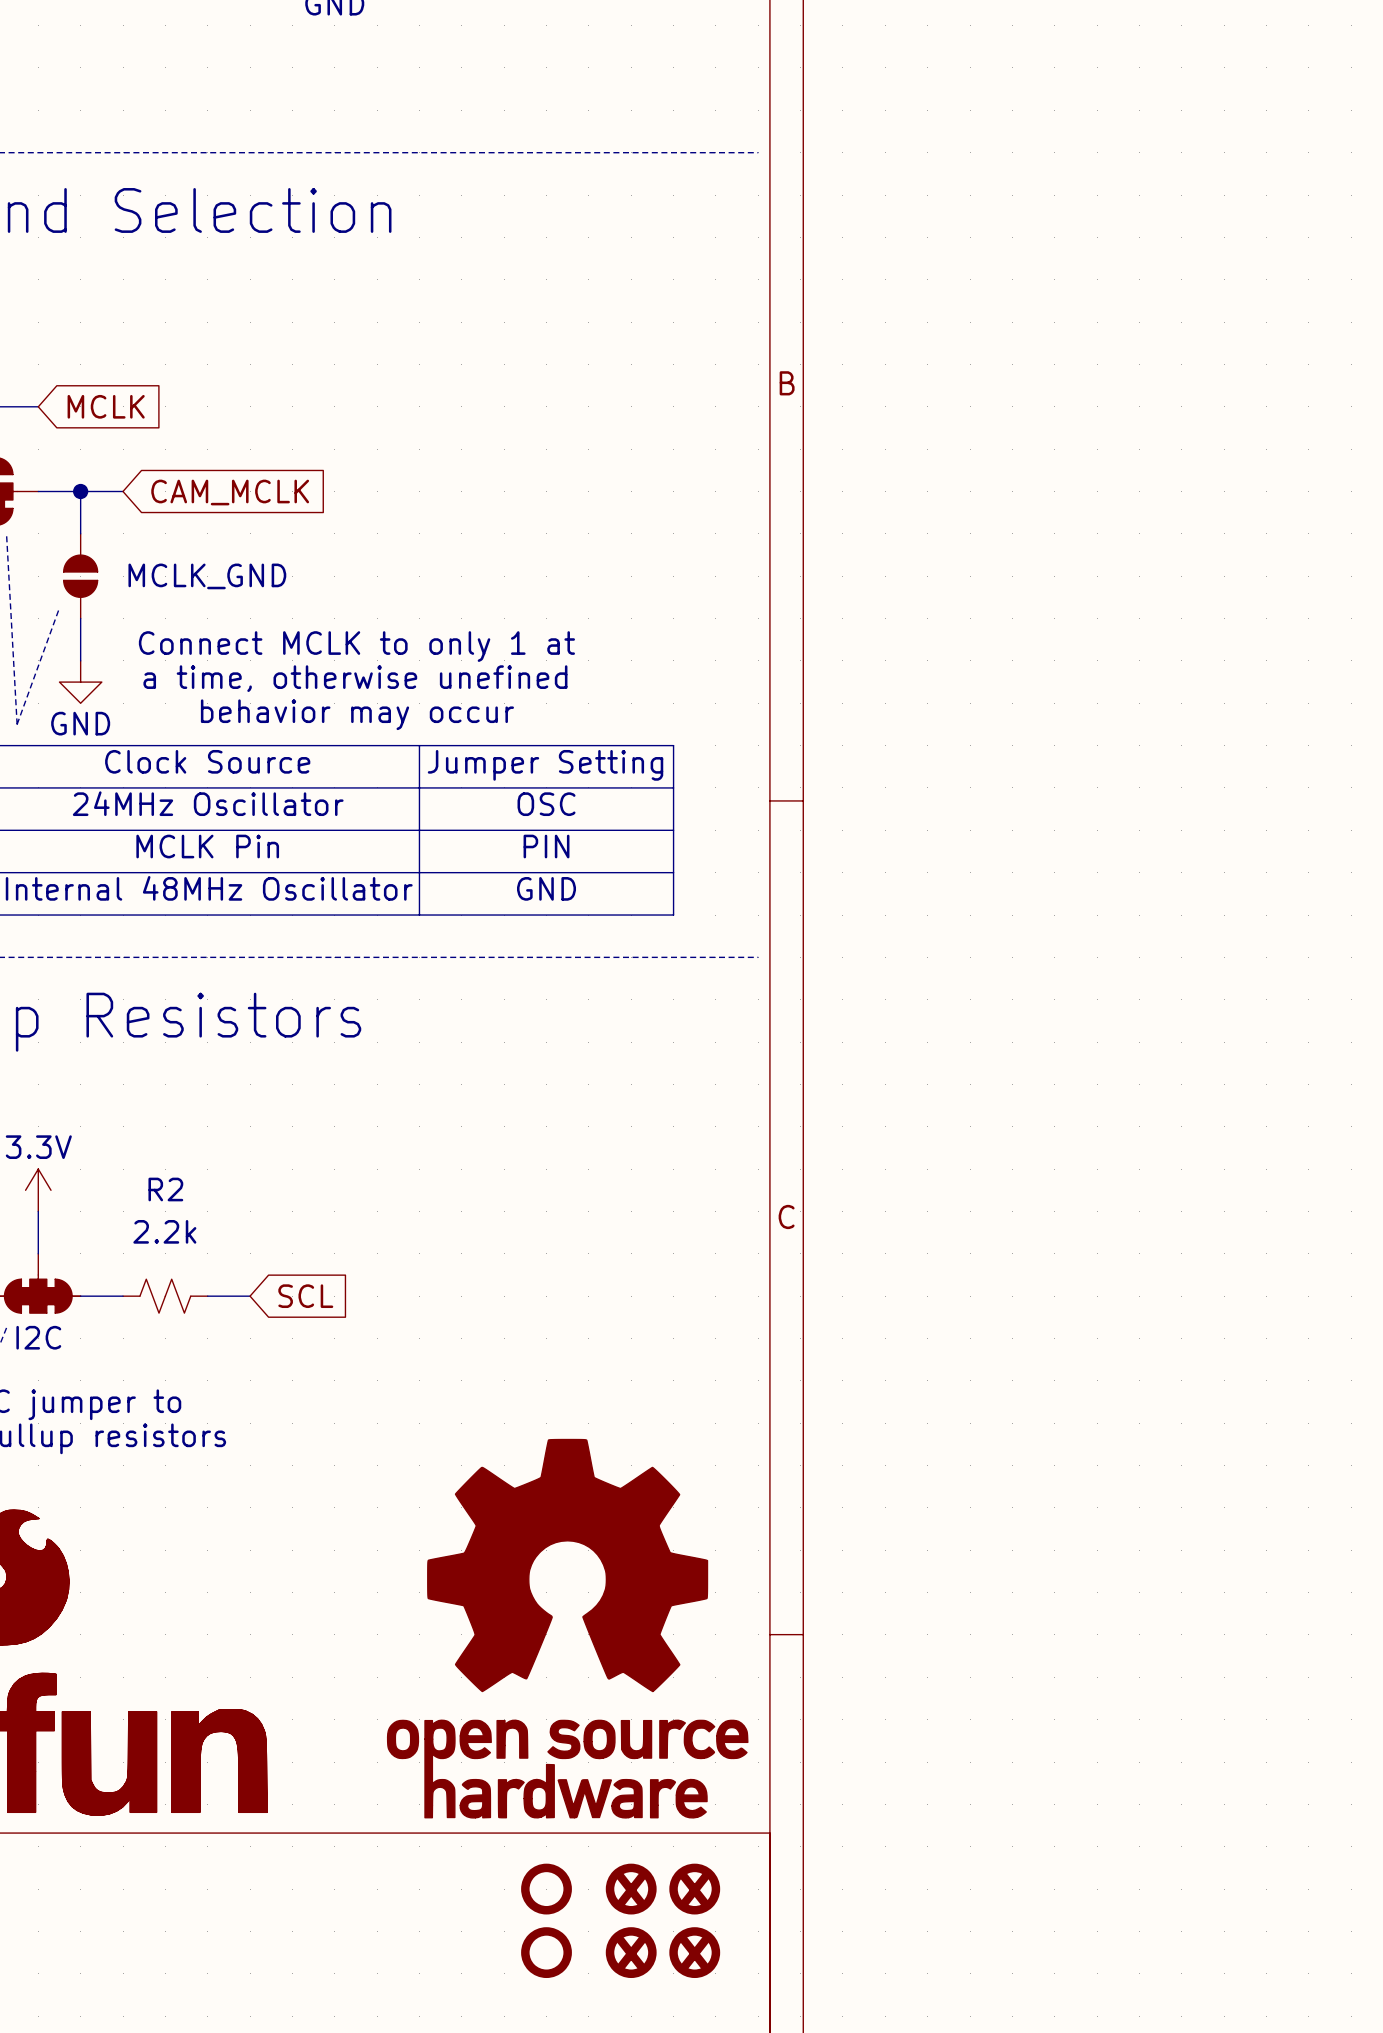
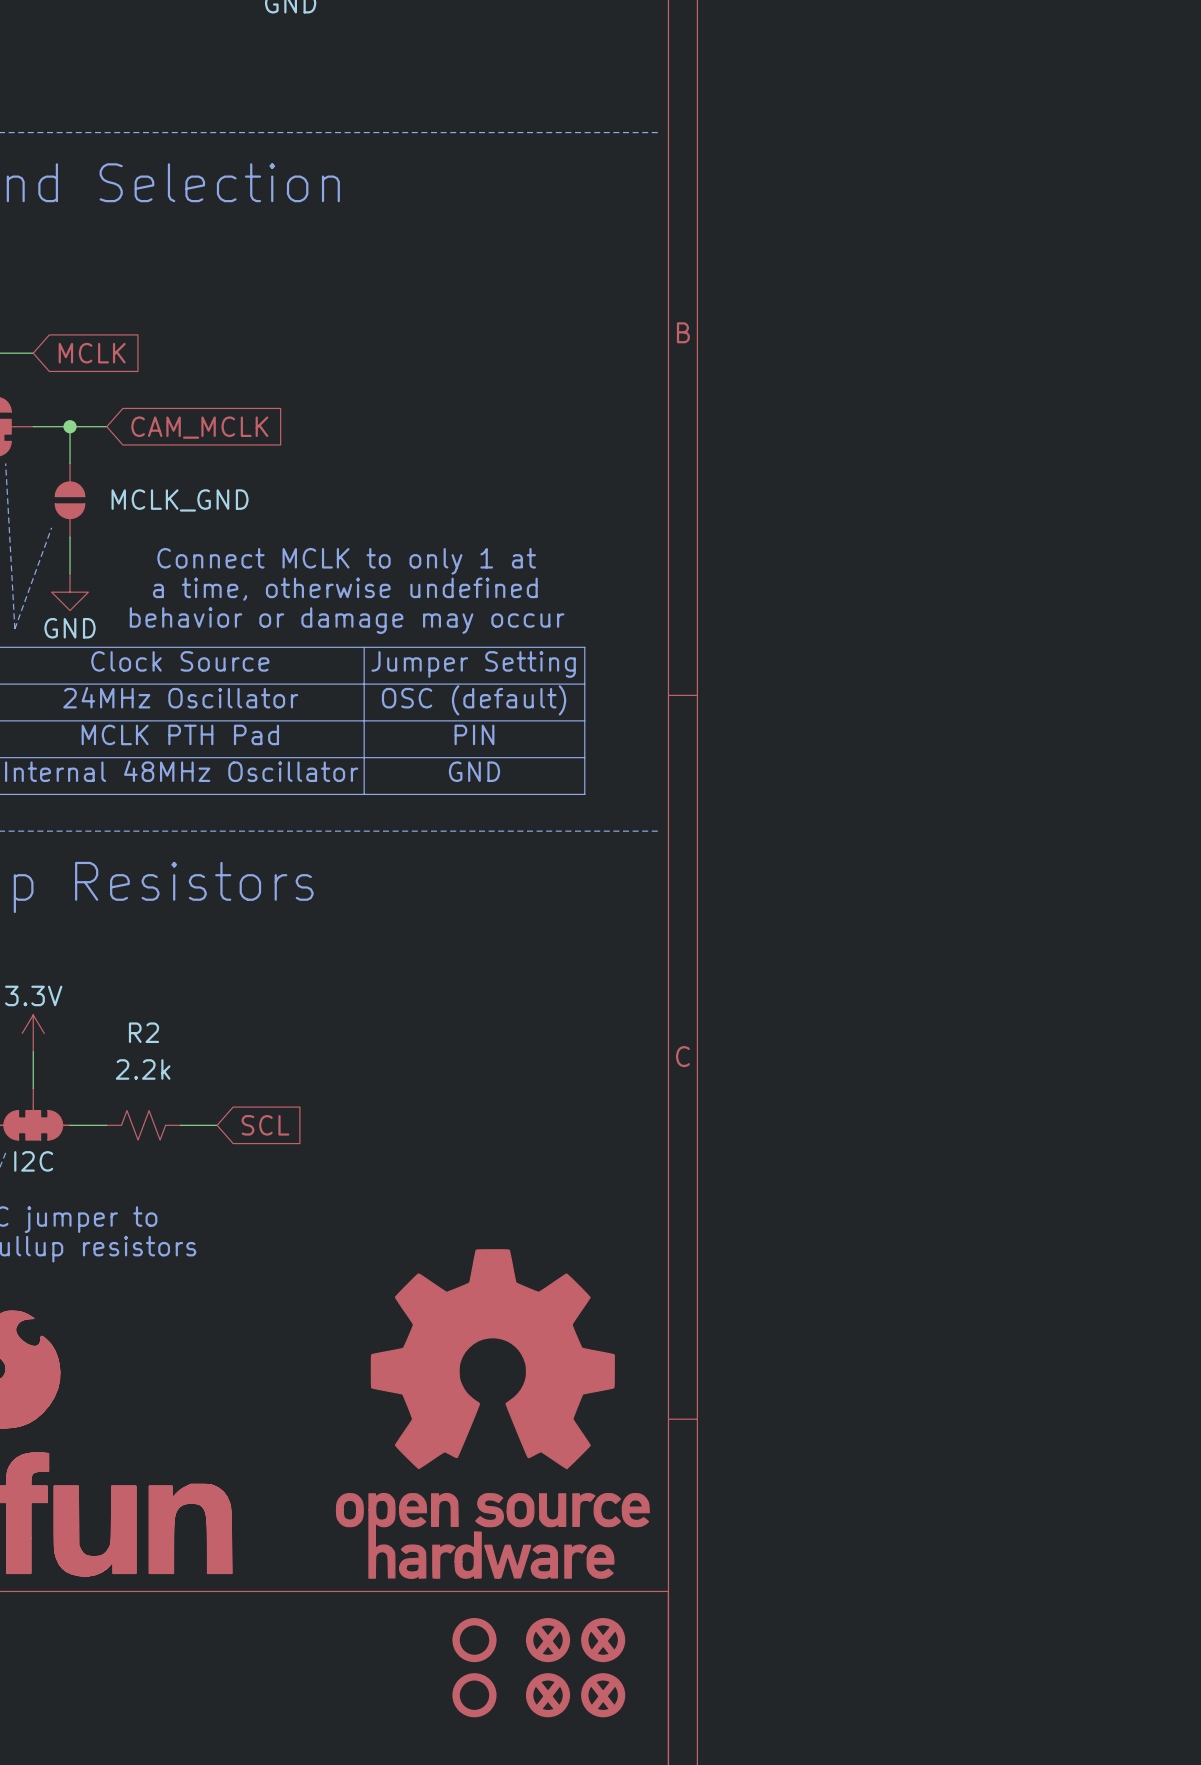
text position: Connect MCLK to only 1 at (356, 646) -> Connect MCLK to only 1 at (346, 561)
text: a time, otherwise unefined (355, 678) -> a time, otherwise undefined (345, 589)
text: behavior may occur (357, 714) -> behavior or damage may occur (347, 620)
text: OSC (546, 804) -> OSC (default) (474, 700)
text: MCLK Pin (207, 846) -> MCLK PTH Pad (180, 734)

